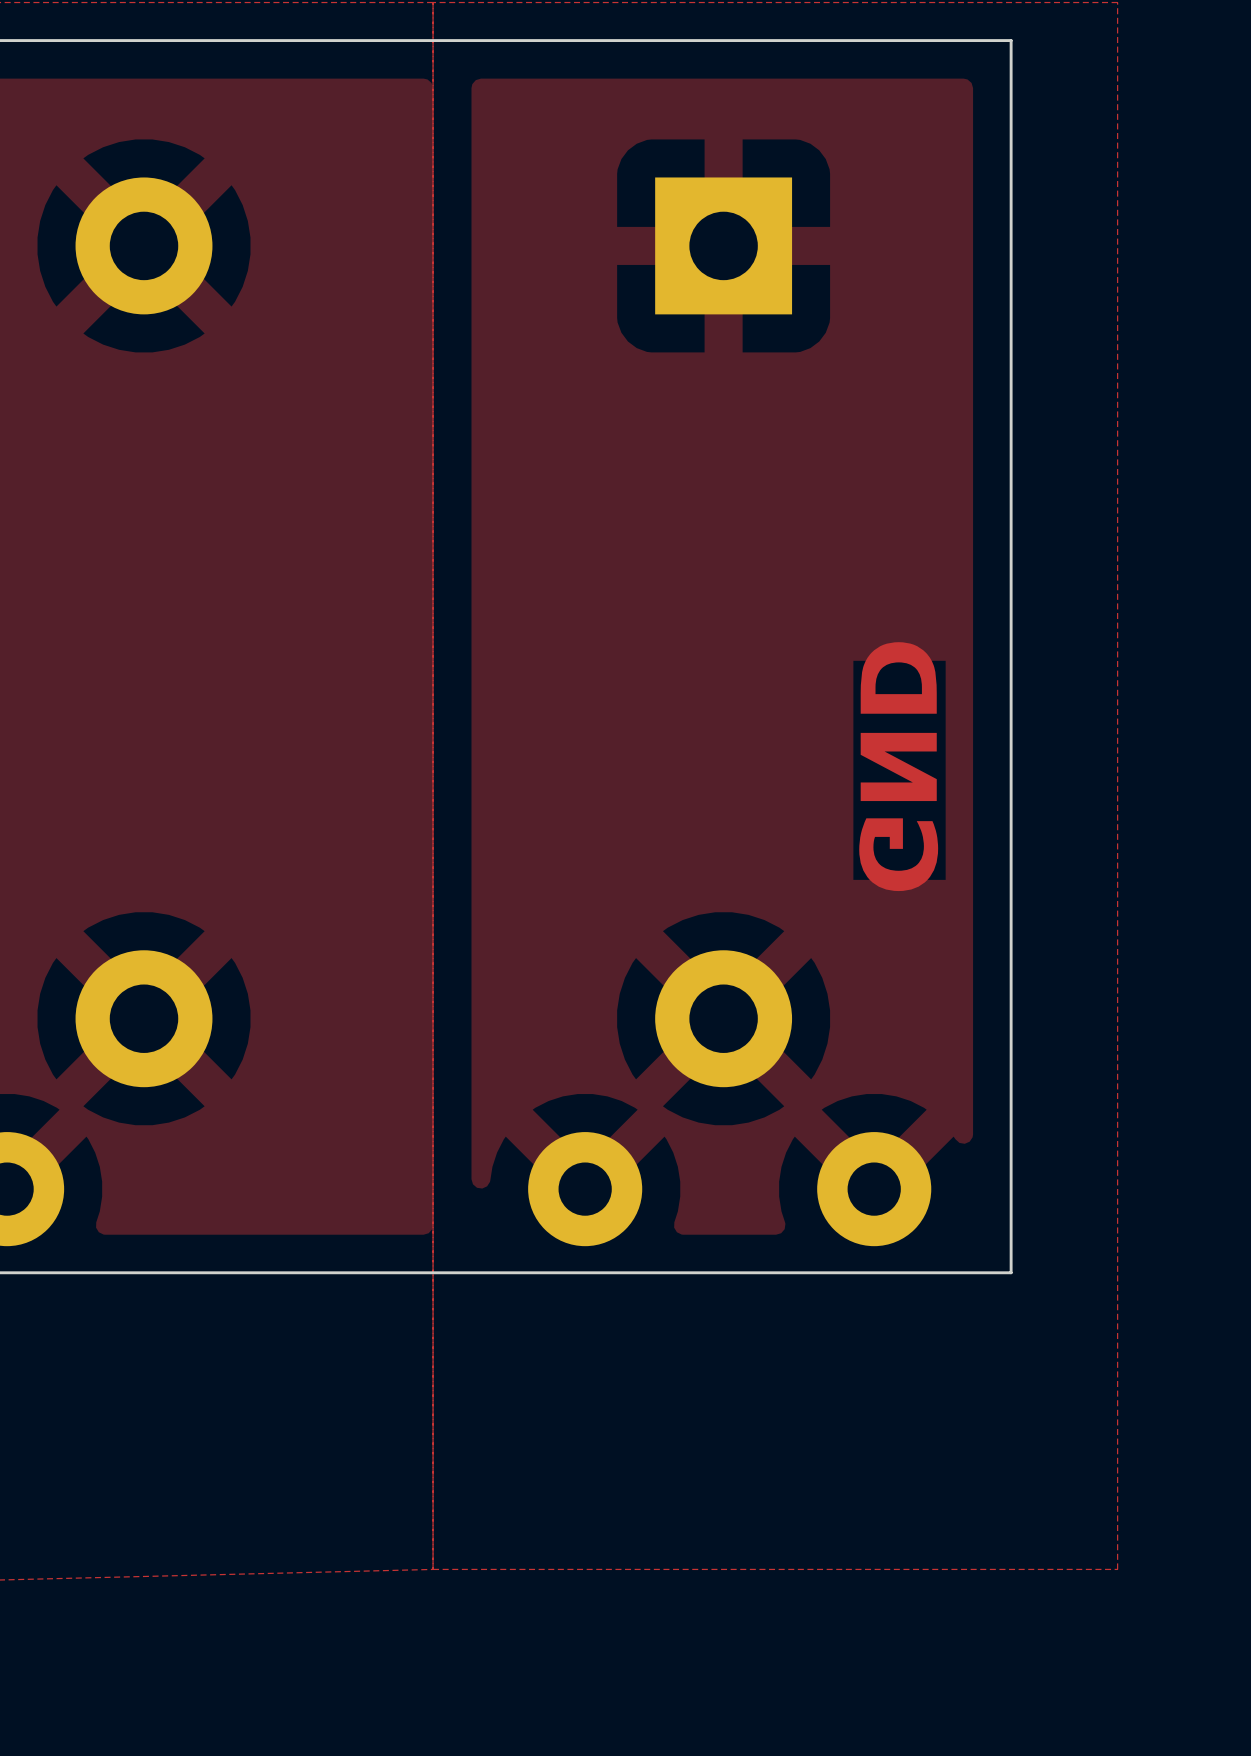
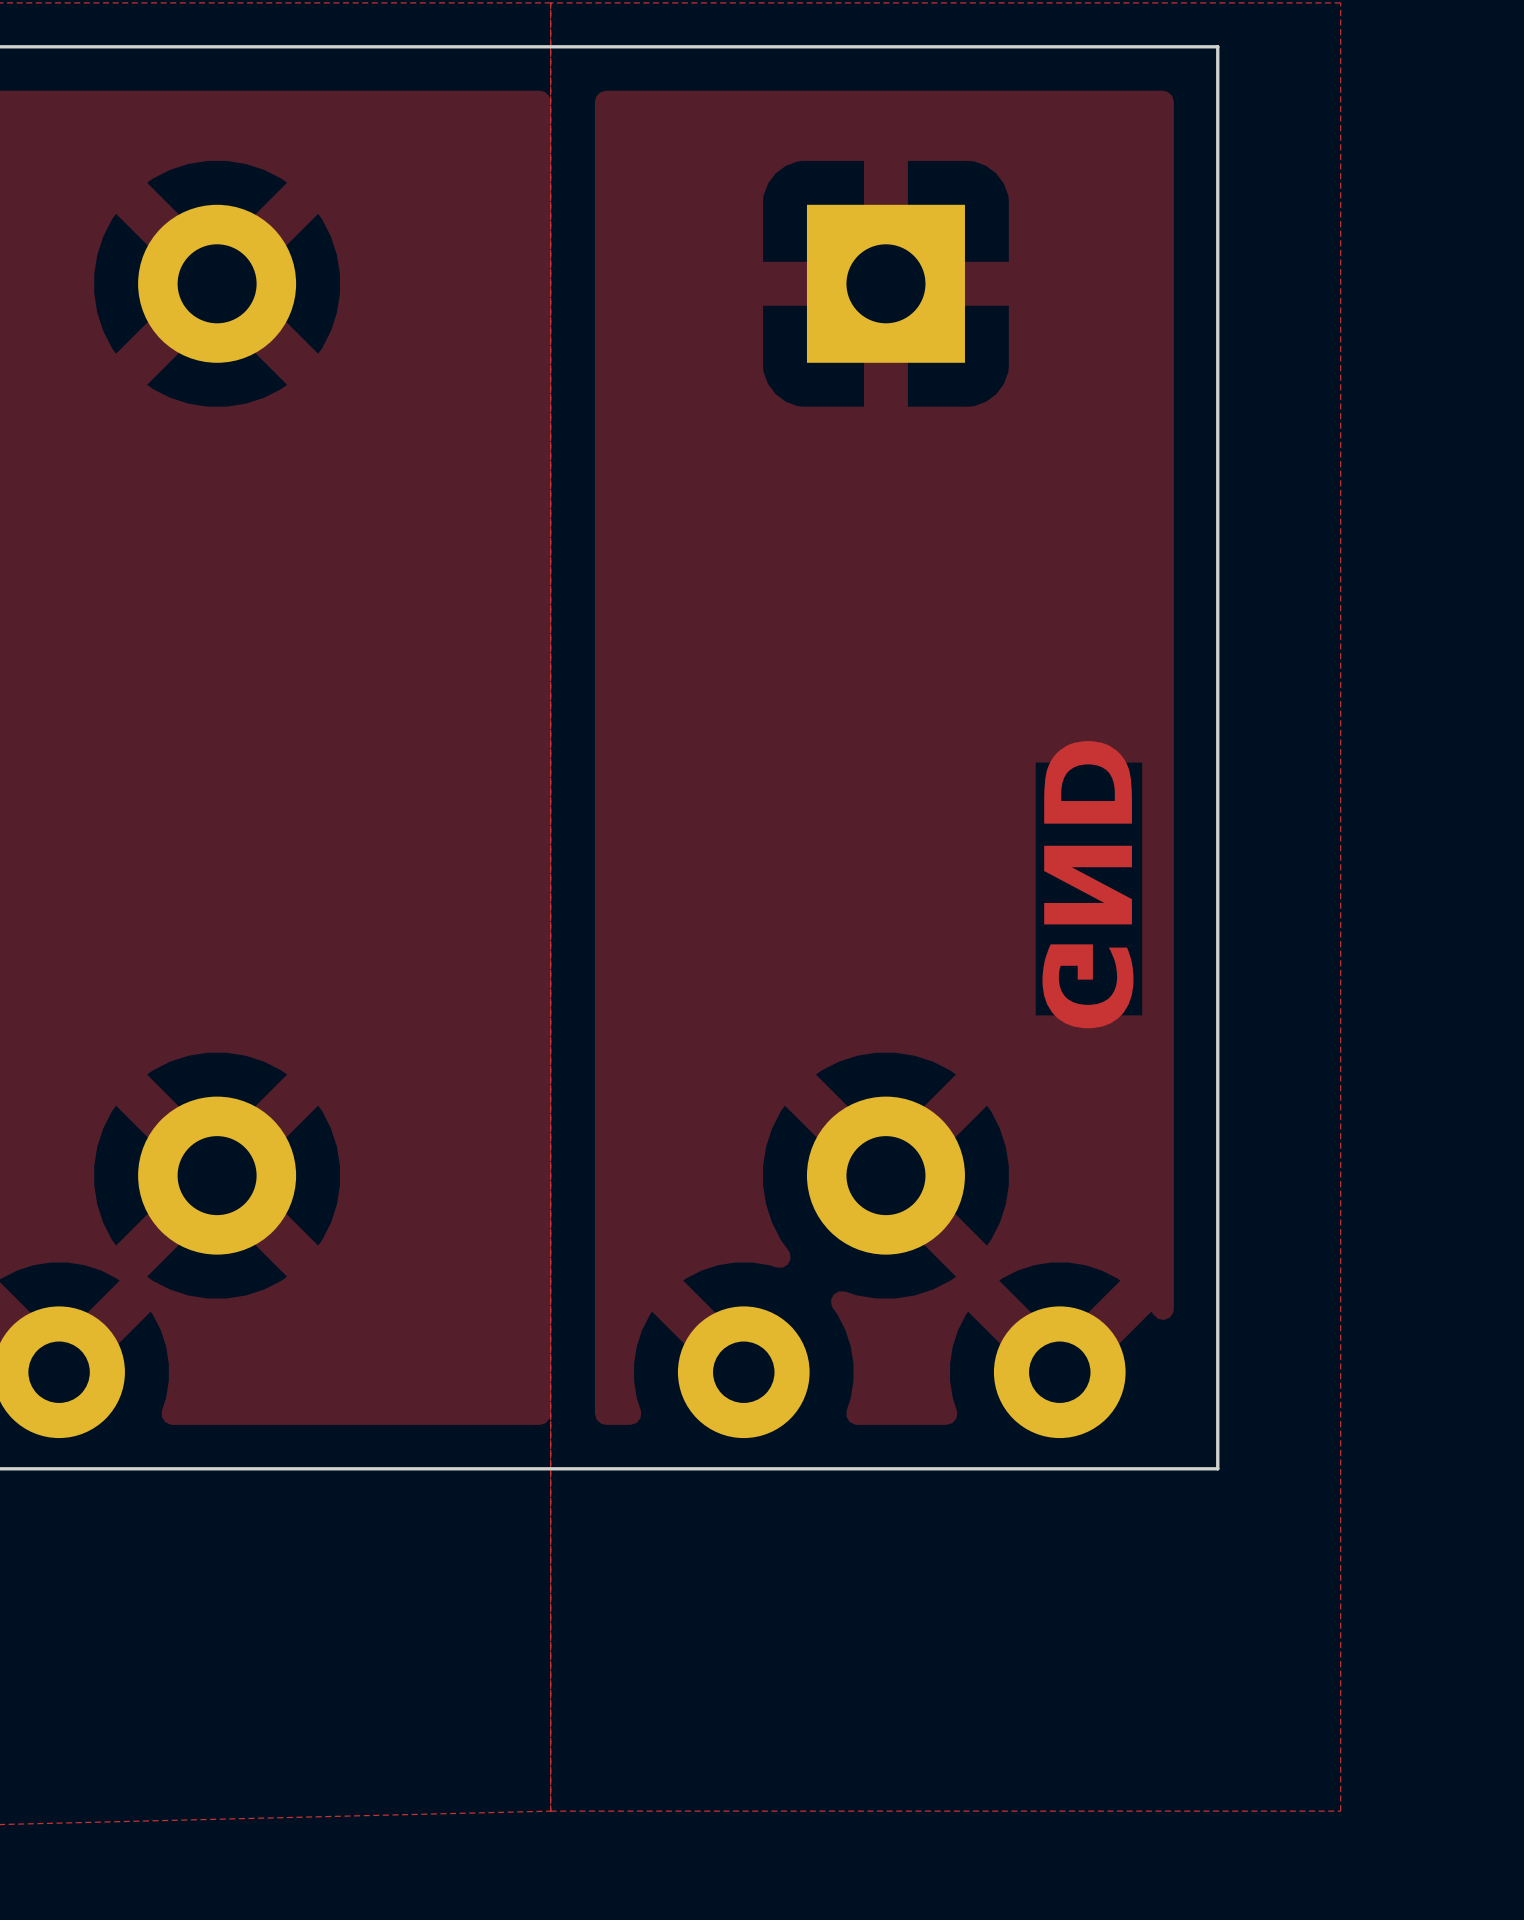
part position: (585, 1189) -> (743, 1372)

